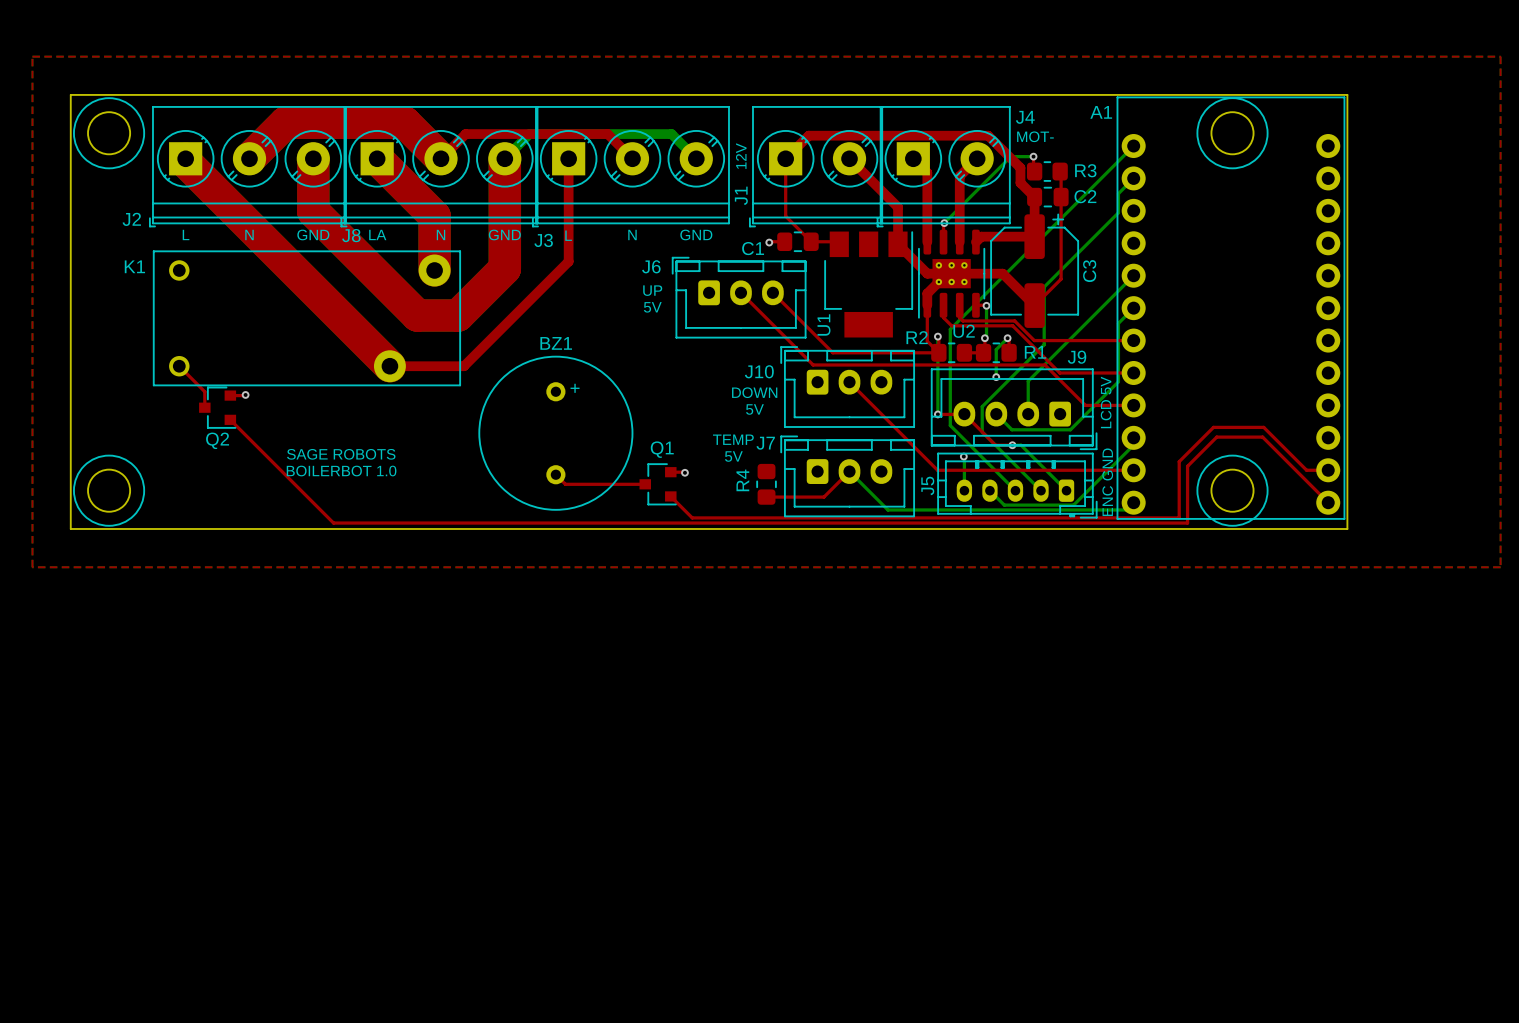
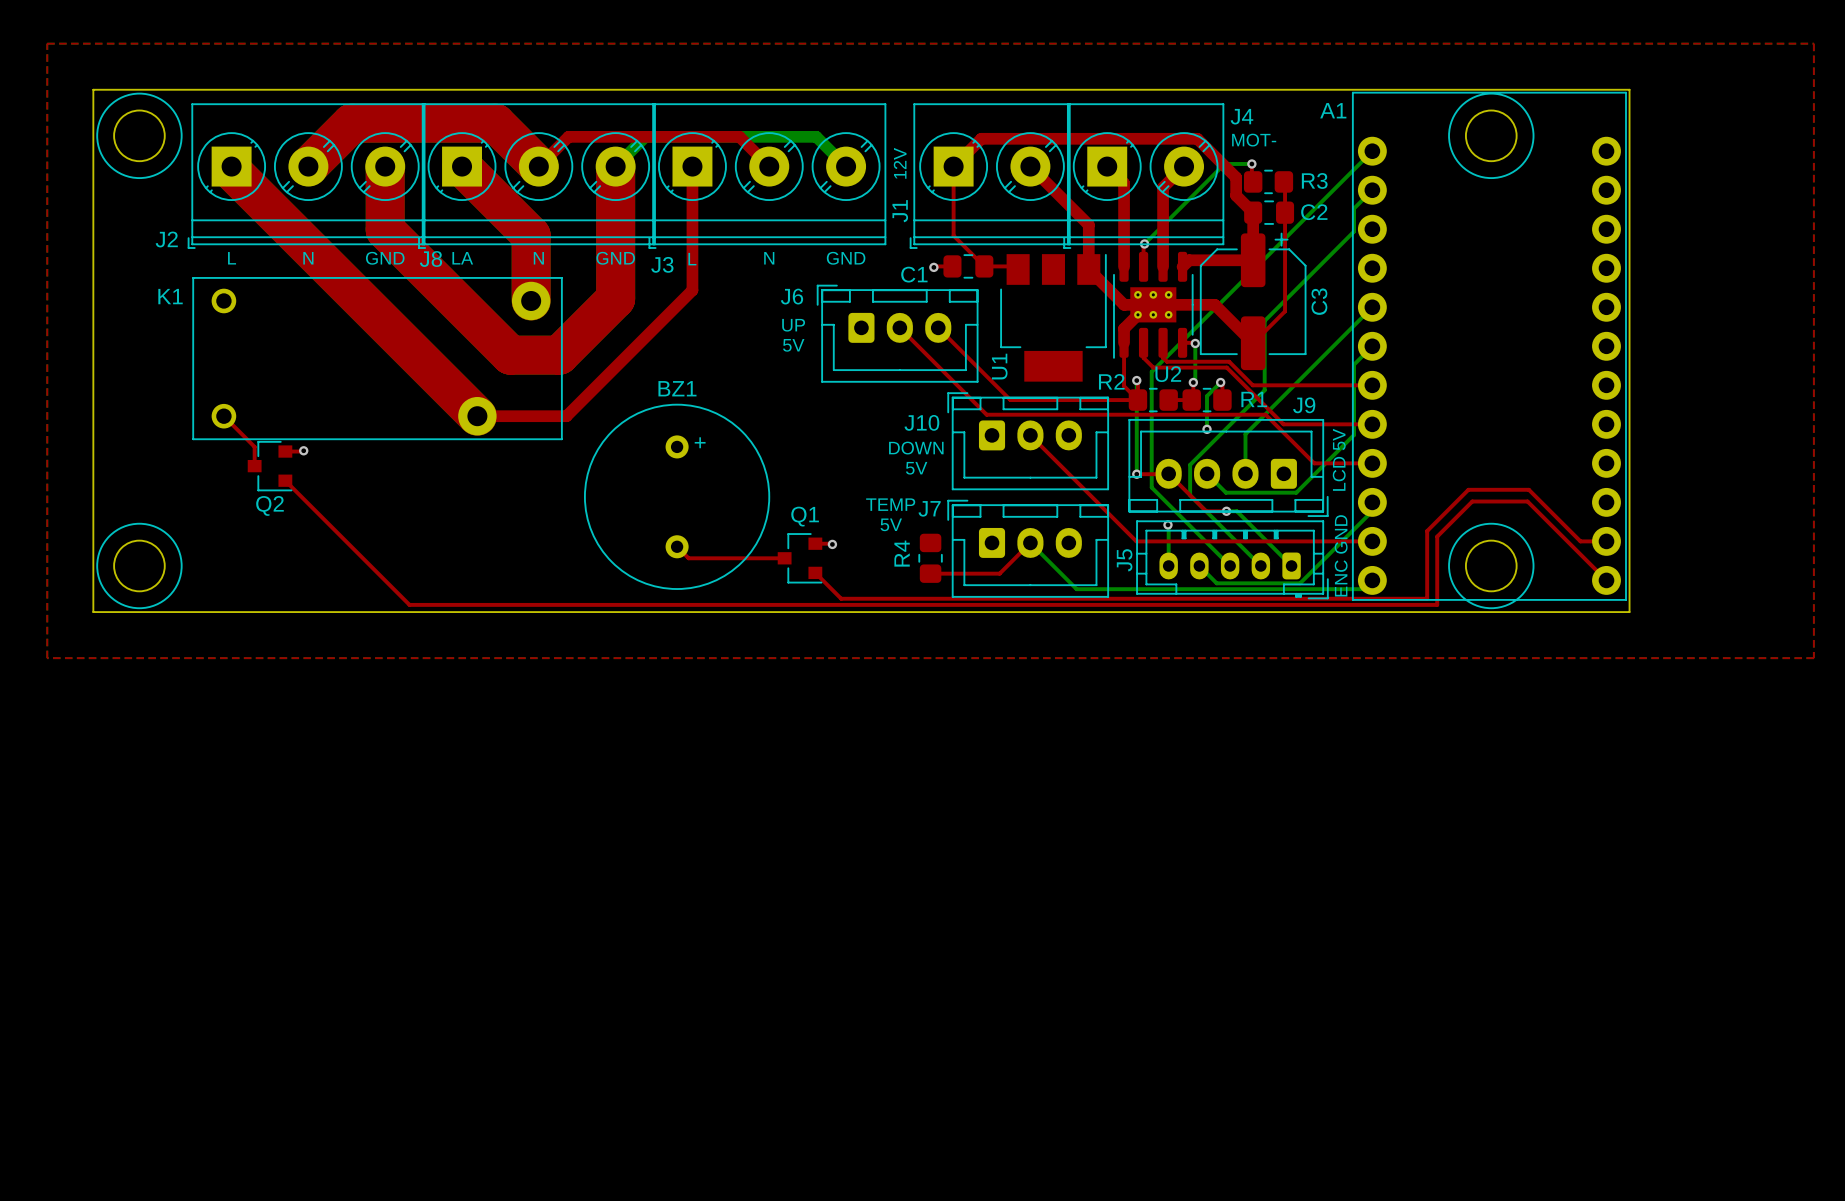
text: SAGE ROBOTS (341, 454) -> none
text: BOILERBOT 1.0 (341, 471) -> none

